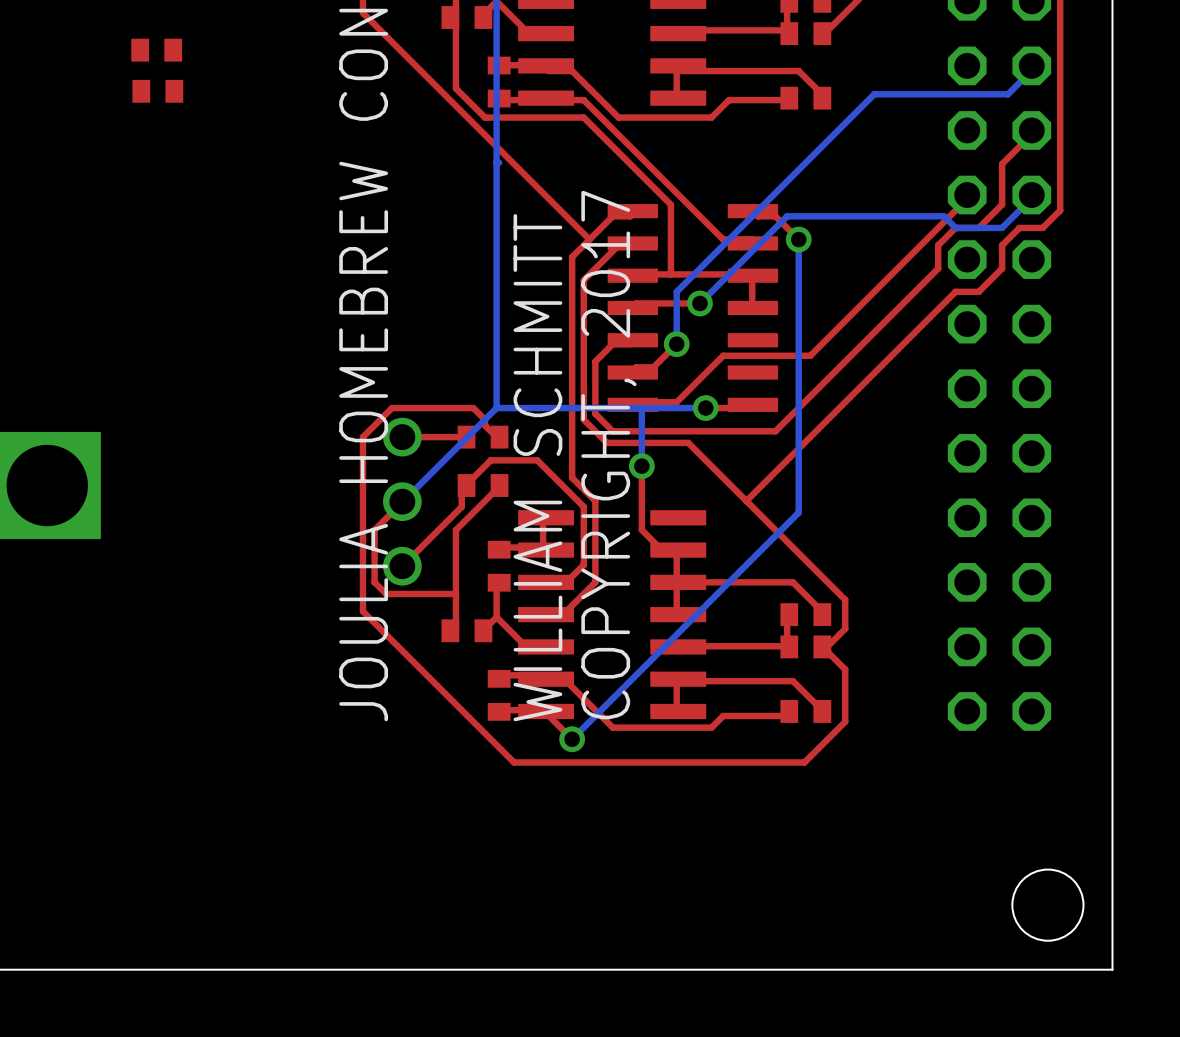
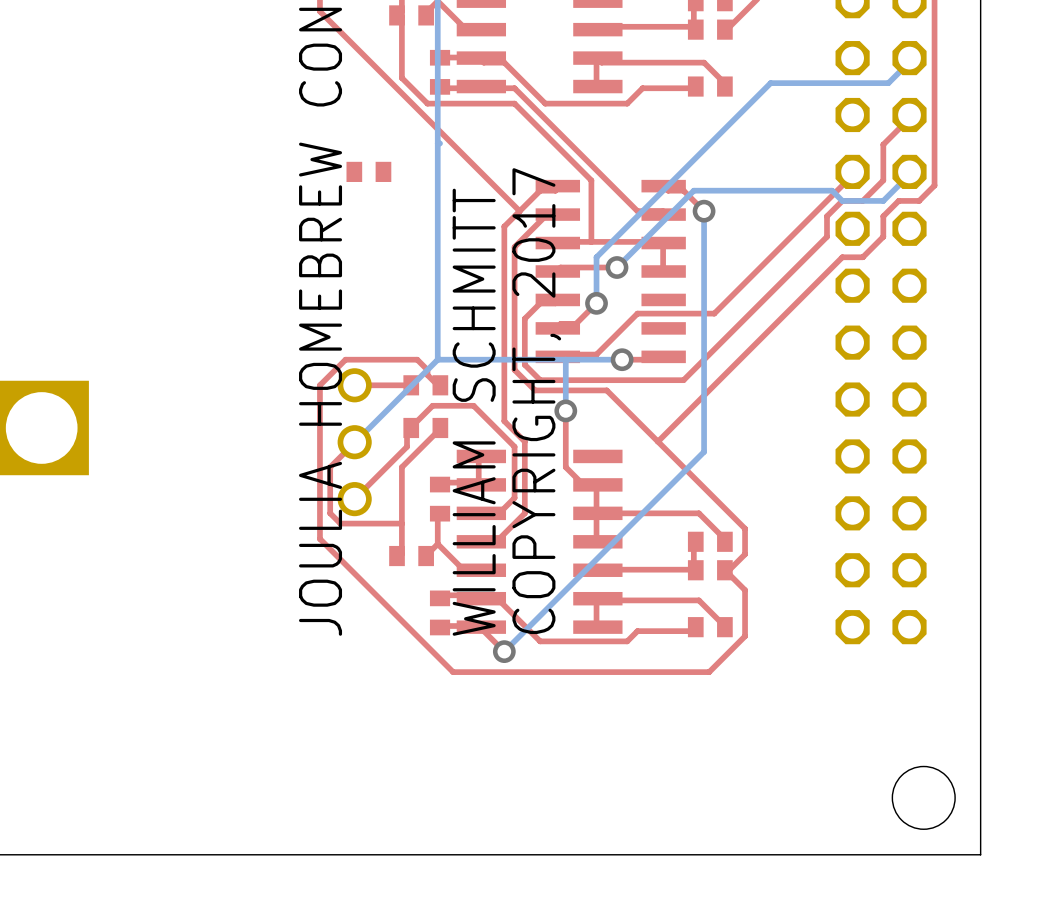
part: (156, 50) -> none
part: (157, 91) -> none
part: none -> (368, 171)

